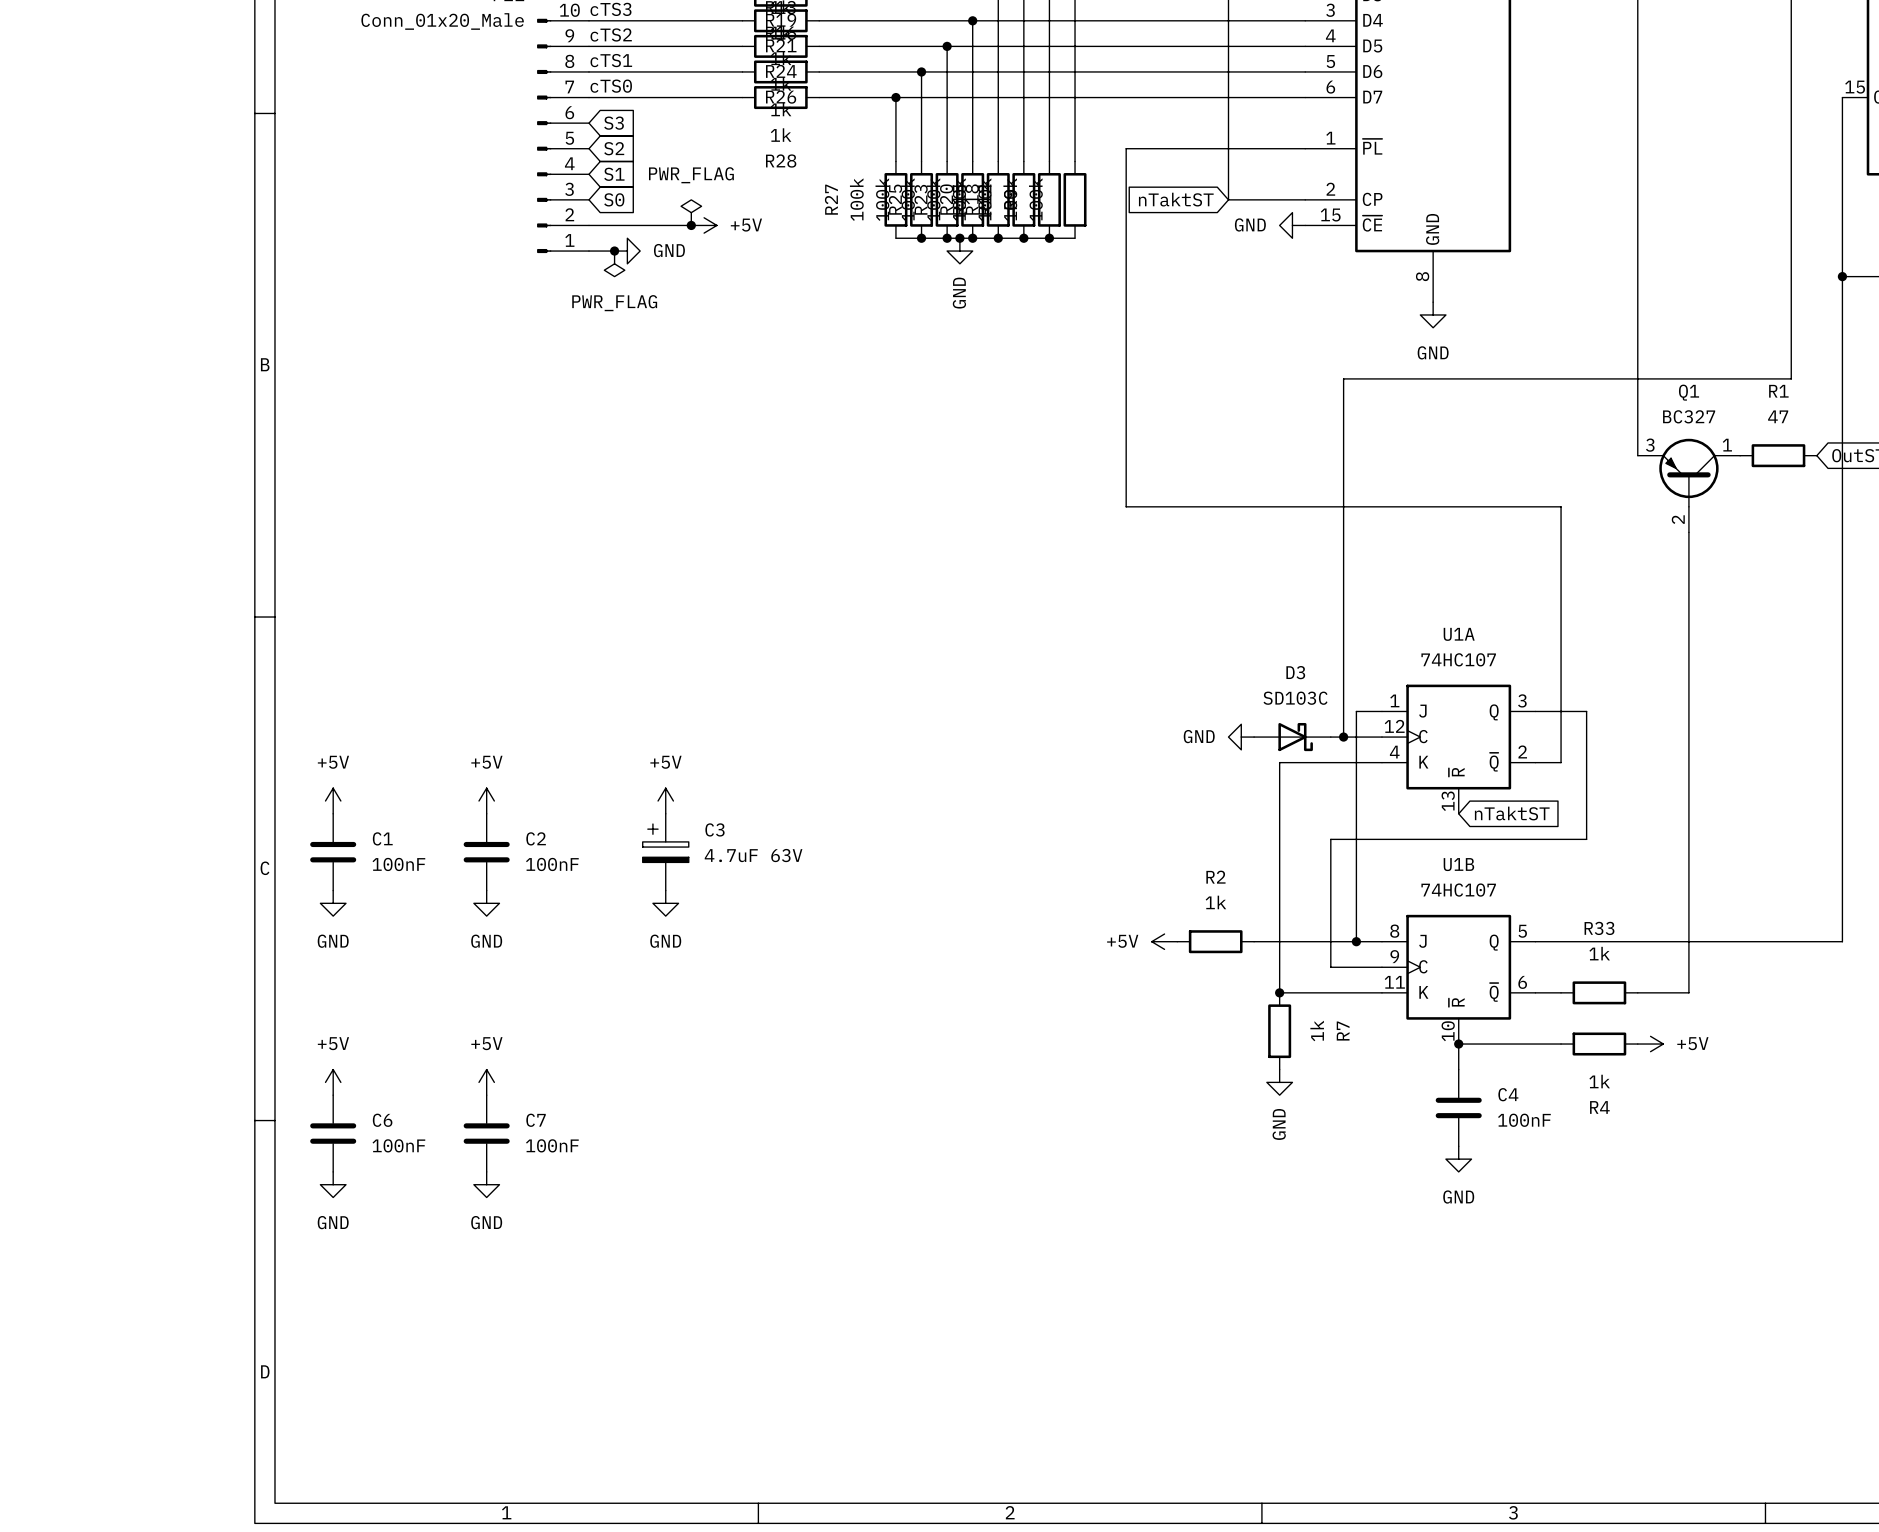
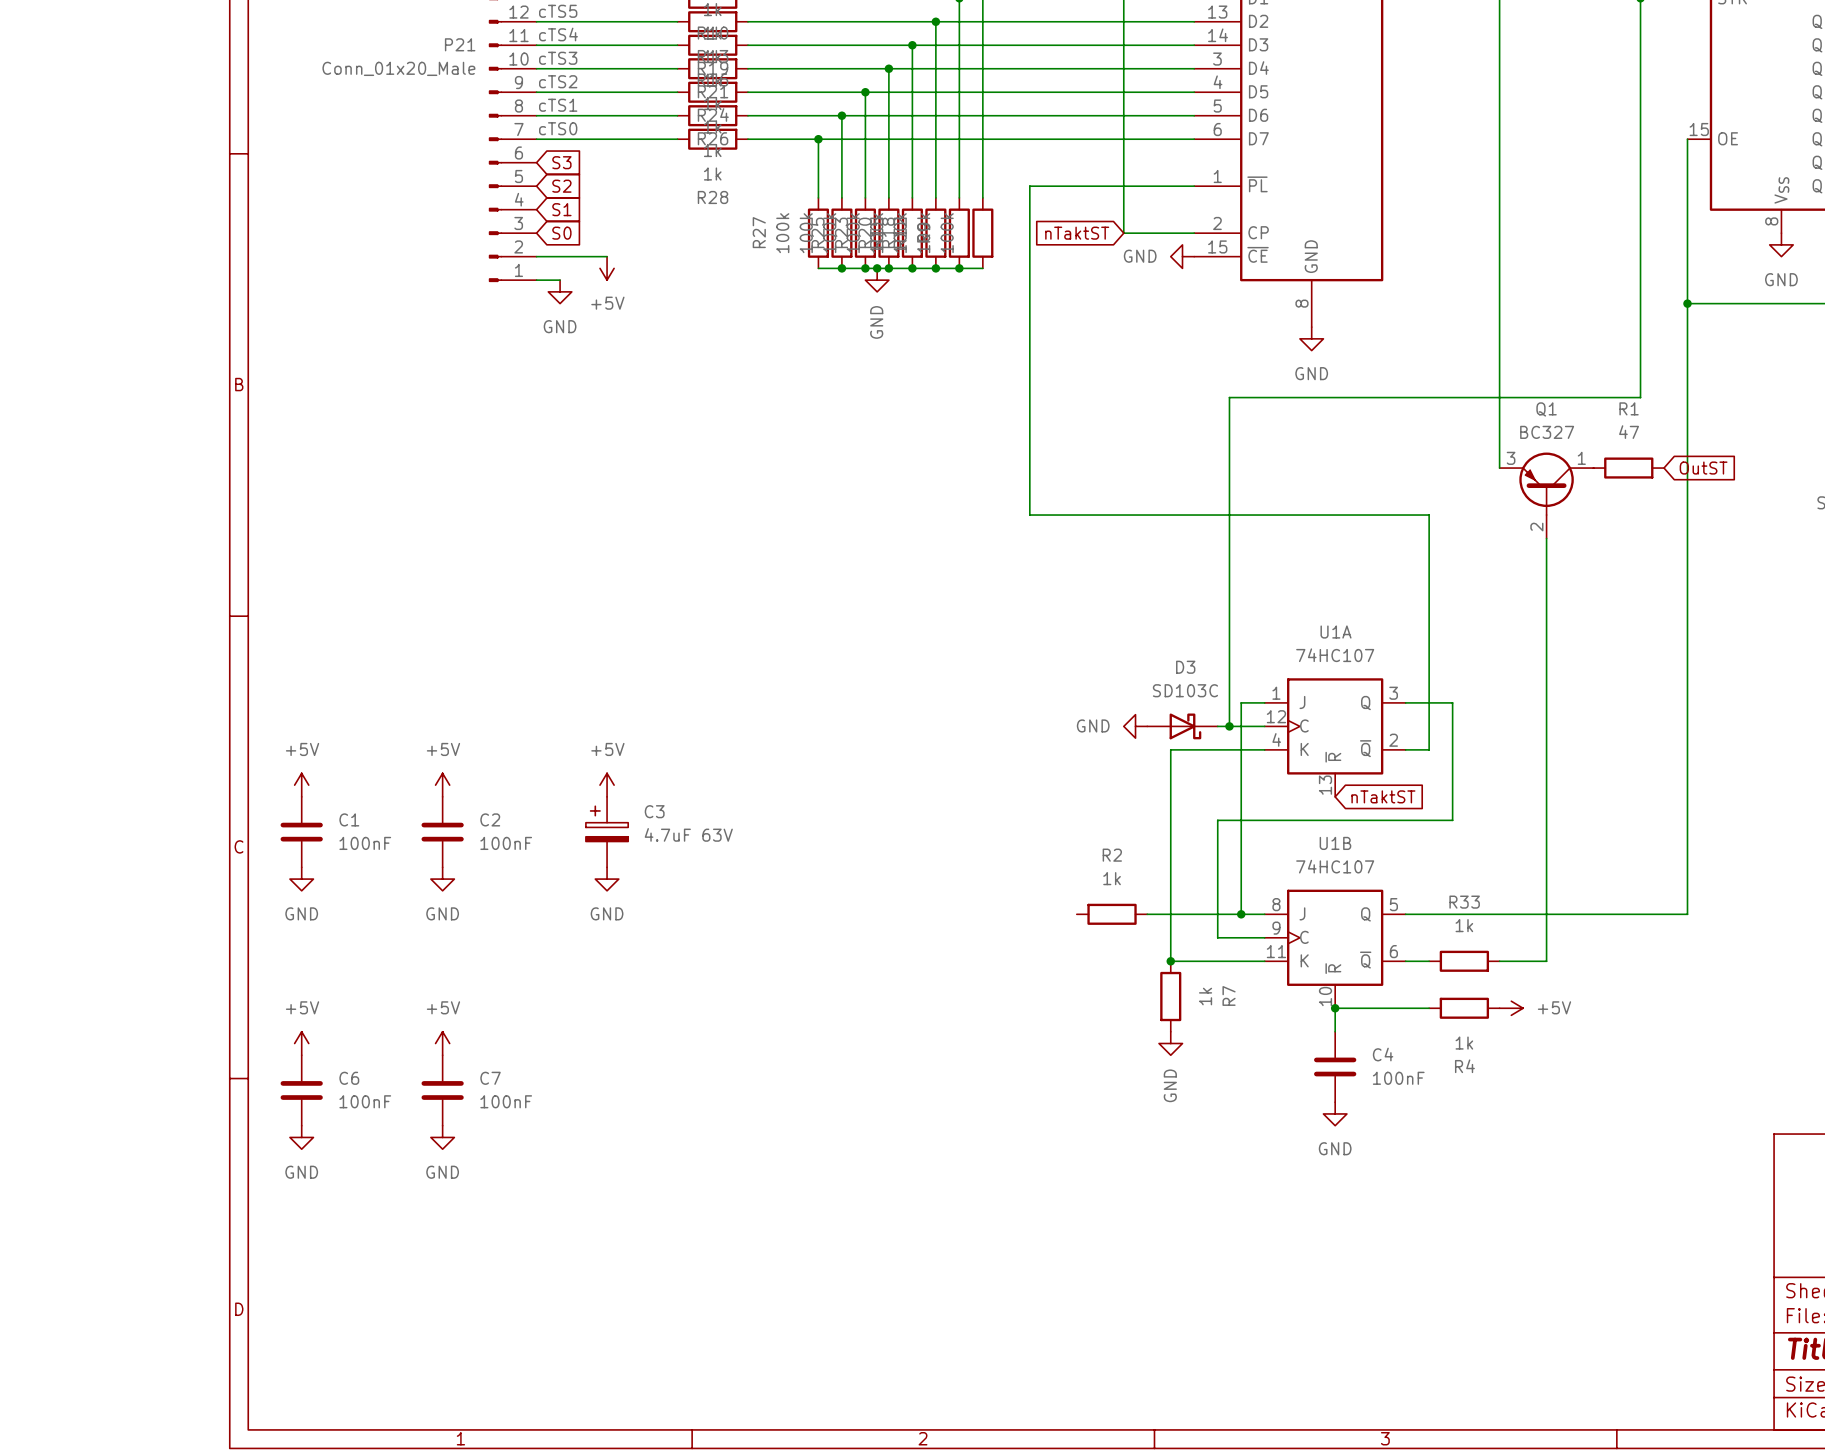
power symbol: PWR_FLAG (691, 212) -> none
wire: (665, 225) (691, 225) -> none
junction: (691, 225) -> none
power symbol rotation: 0° (704, 225) -> 90° clockwise (607, 268)
power symbol position: +5V (704, 225) -> +5V (607, 268)
junction: (614, 251) -> none
power symbol: GND (627, 251) -> none
power symbol: PWR_FLAG (614, 263) -> GND (560, 291)
power symbol: +5V (1164, 941) -> none

